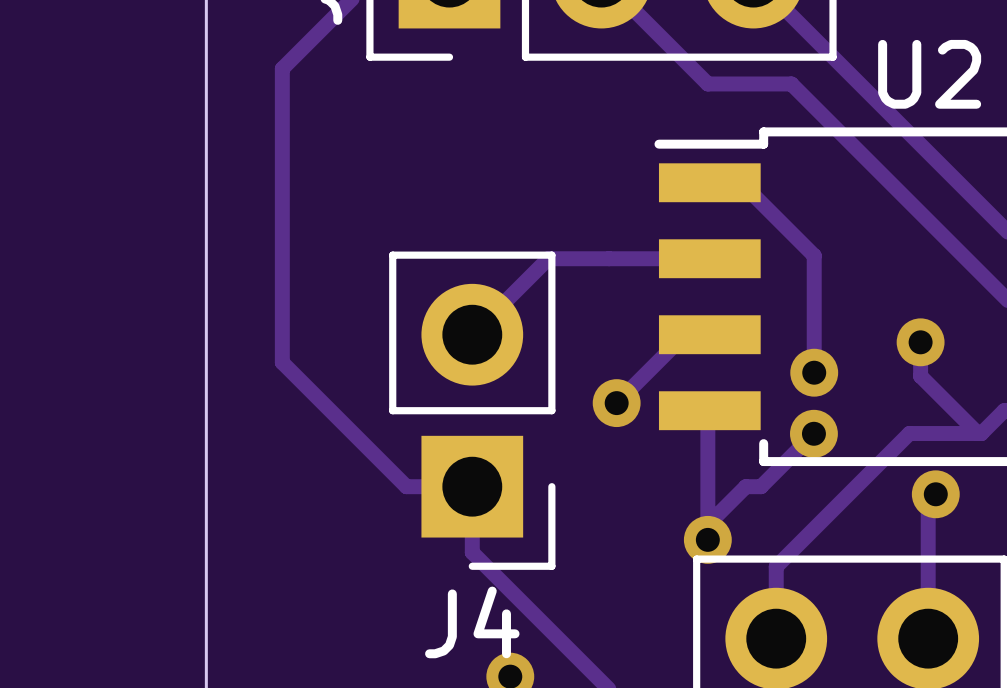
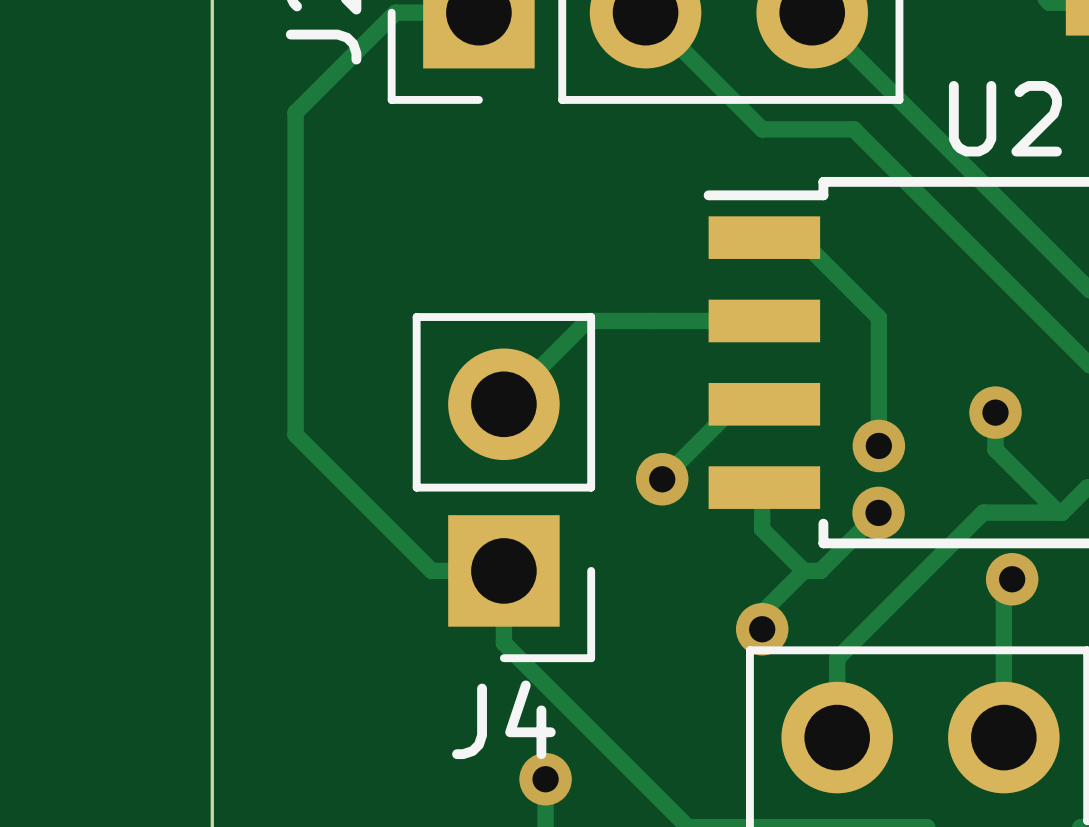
track: (707, 448) (707, 524) -> (762, 529) (803, 570)

